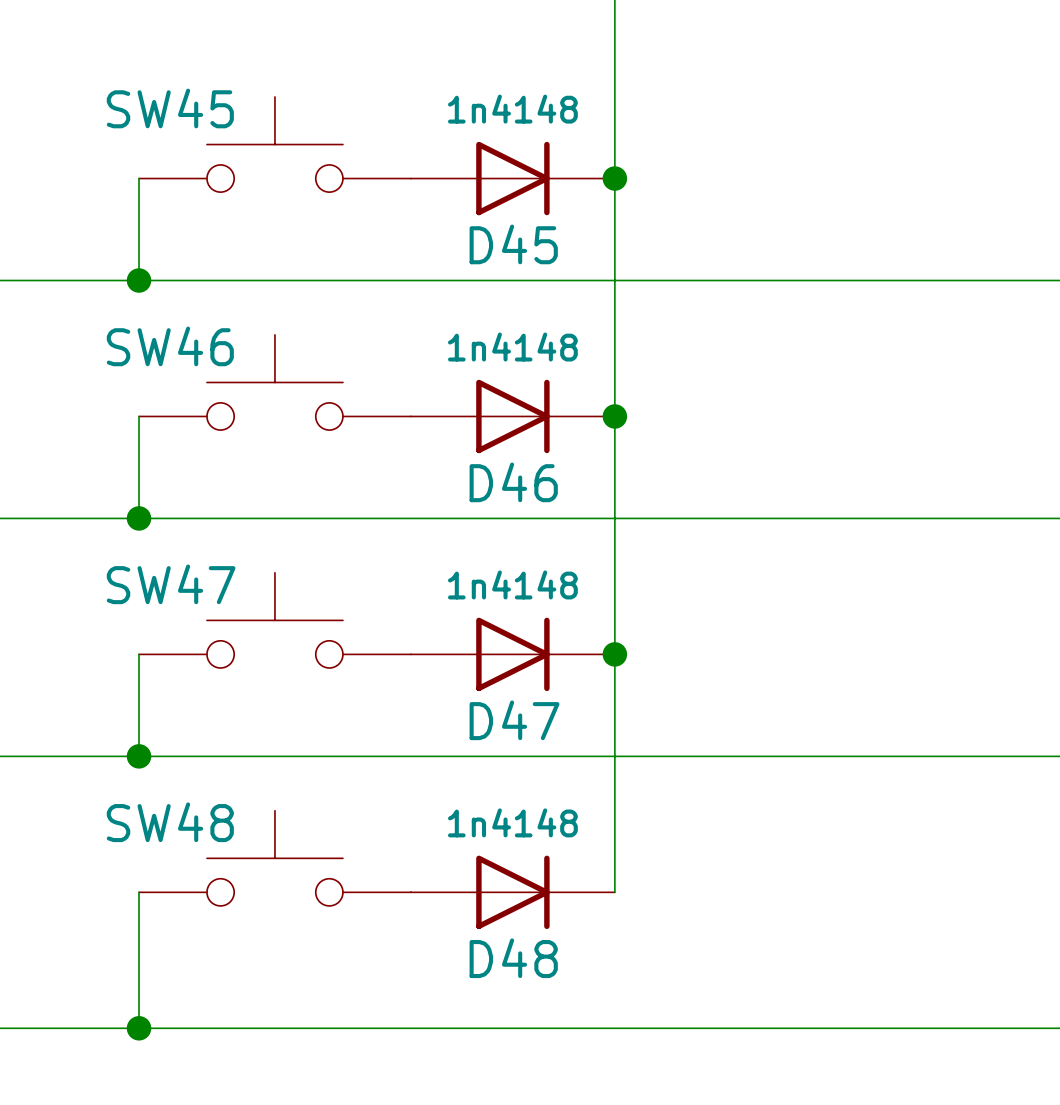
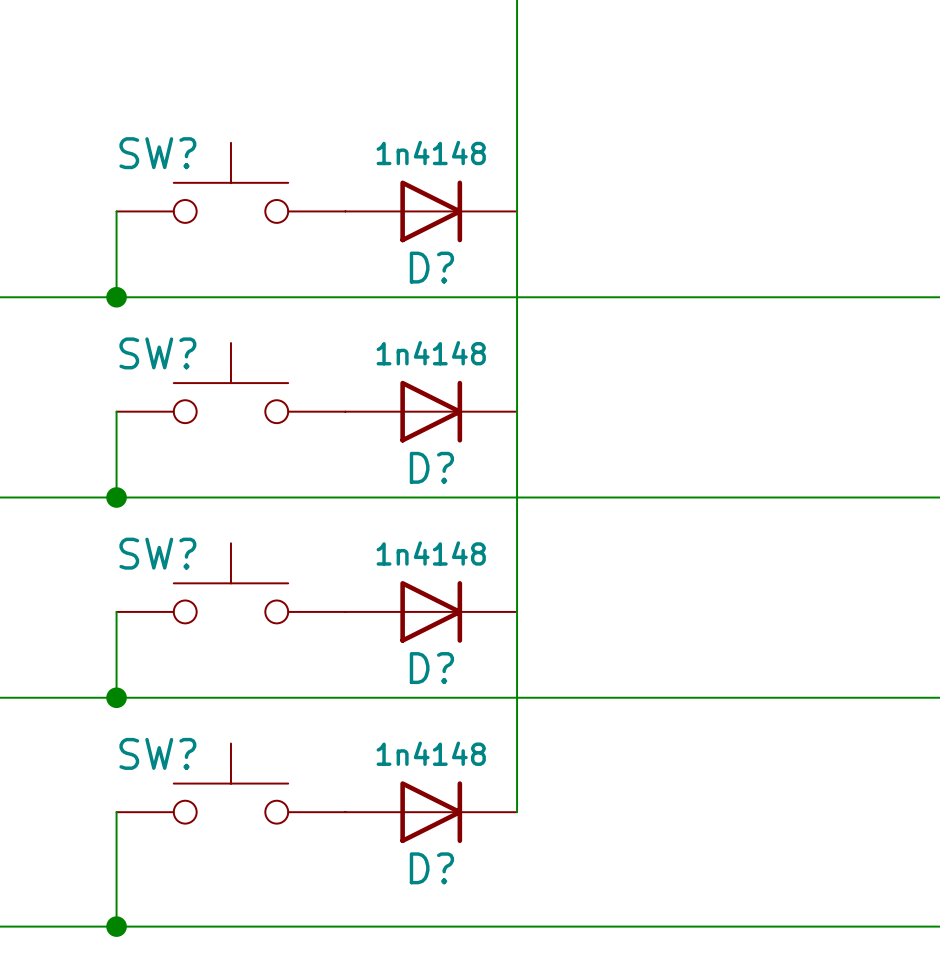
SW45 name: SW45 (170, 108) -> SW? (157, 153)
junction: (614, 178) -> none
D45 name: D45 (513, 244) -> D? (431, 267)
SW46 name: SW46 (170, 346) -> SW? (157, 353)
junction: (614, 416) -> none
D46 name: D46 (513, 482) -> D? (431, 467)
SW47 name: SW47 (171, 584) -> SW? (157, 553)
junction: (614, 654) -> none
D47 name: D47 (514, 720) -> D? (431, 668)
SW48 name: SW48 (170, 822) -> SW? (157, 753)
D48 name: D48 (513, 958) -> D? (431, 868)

